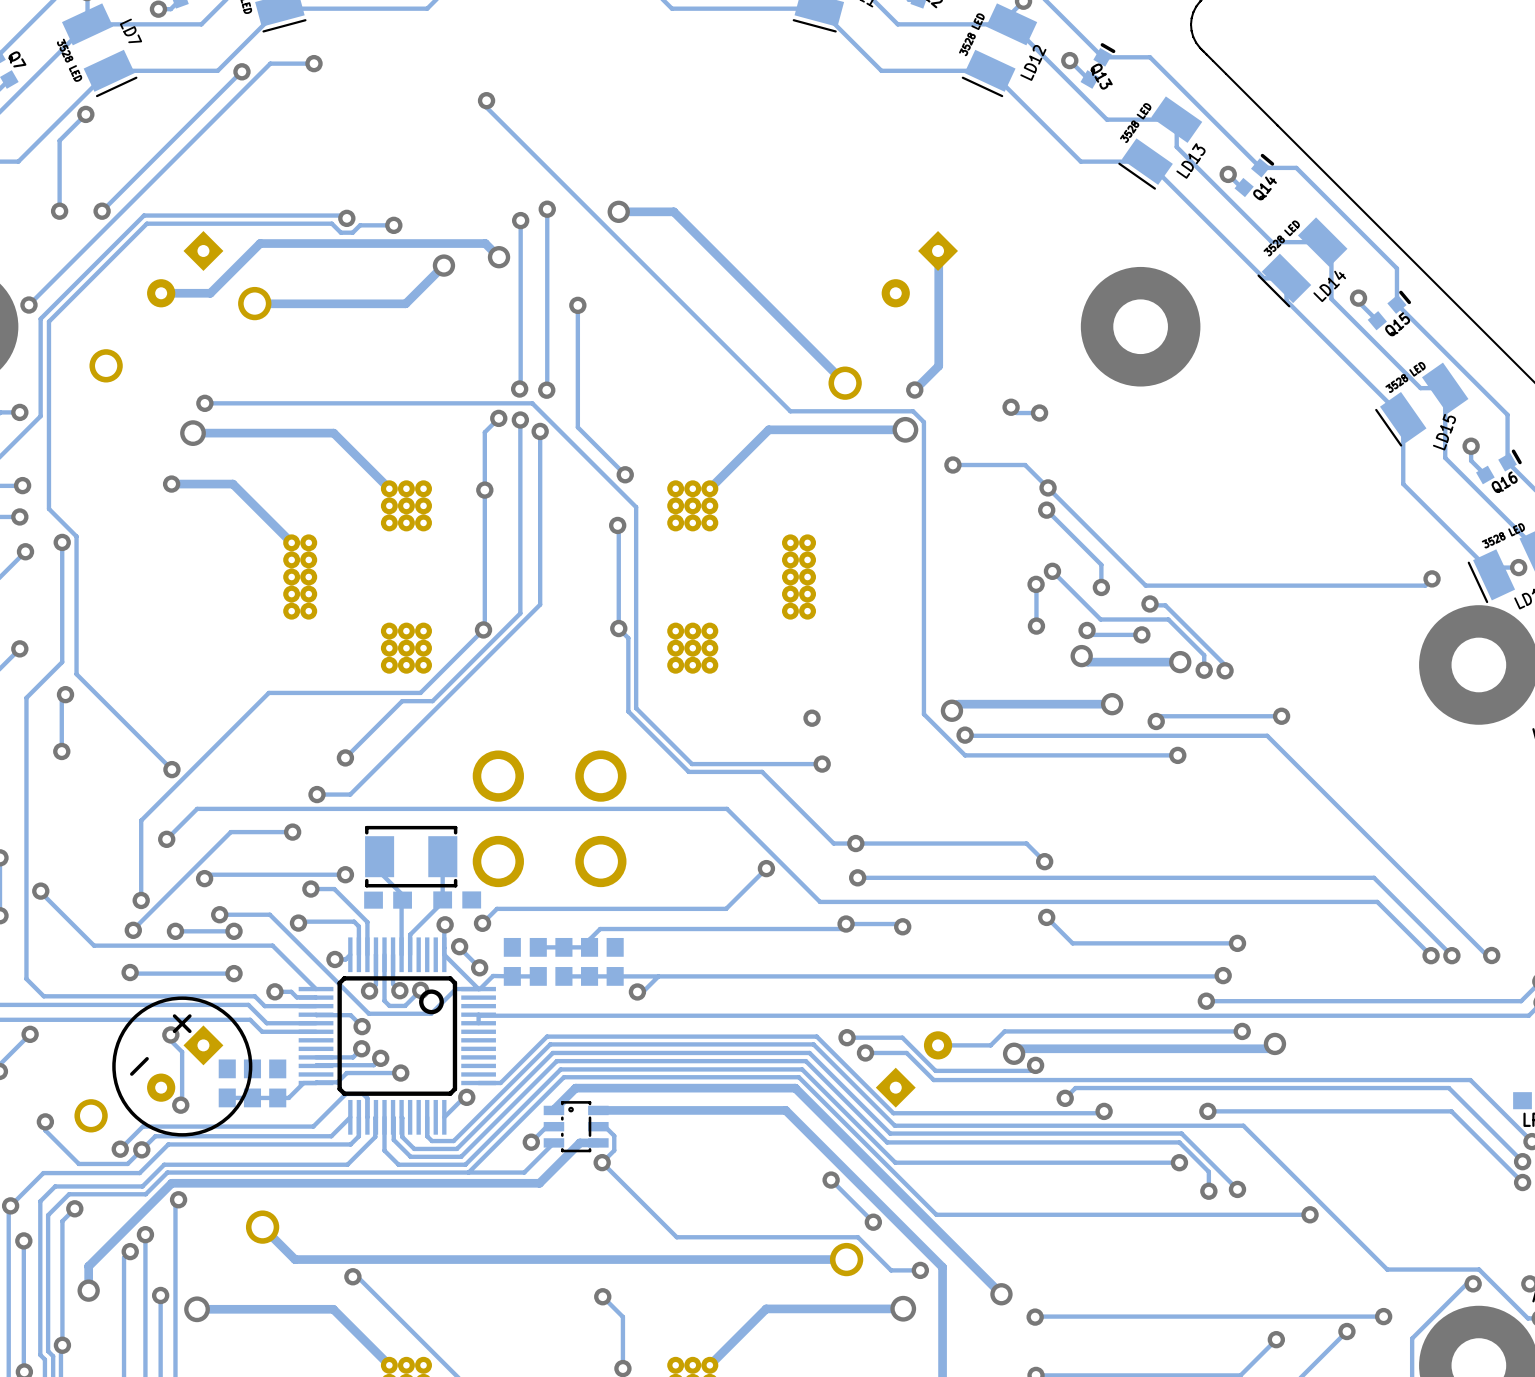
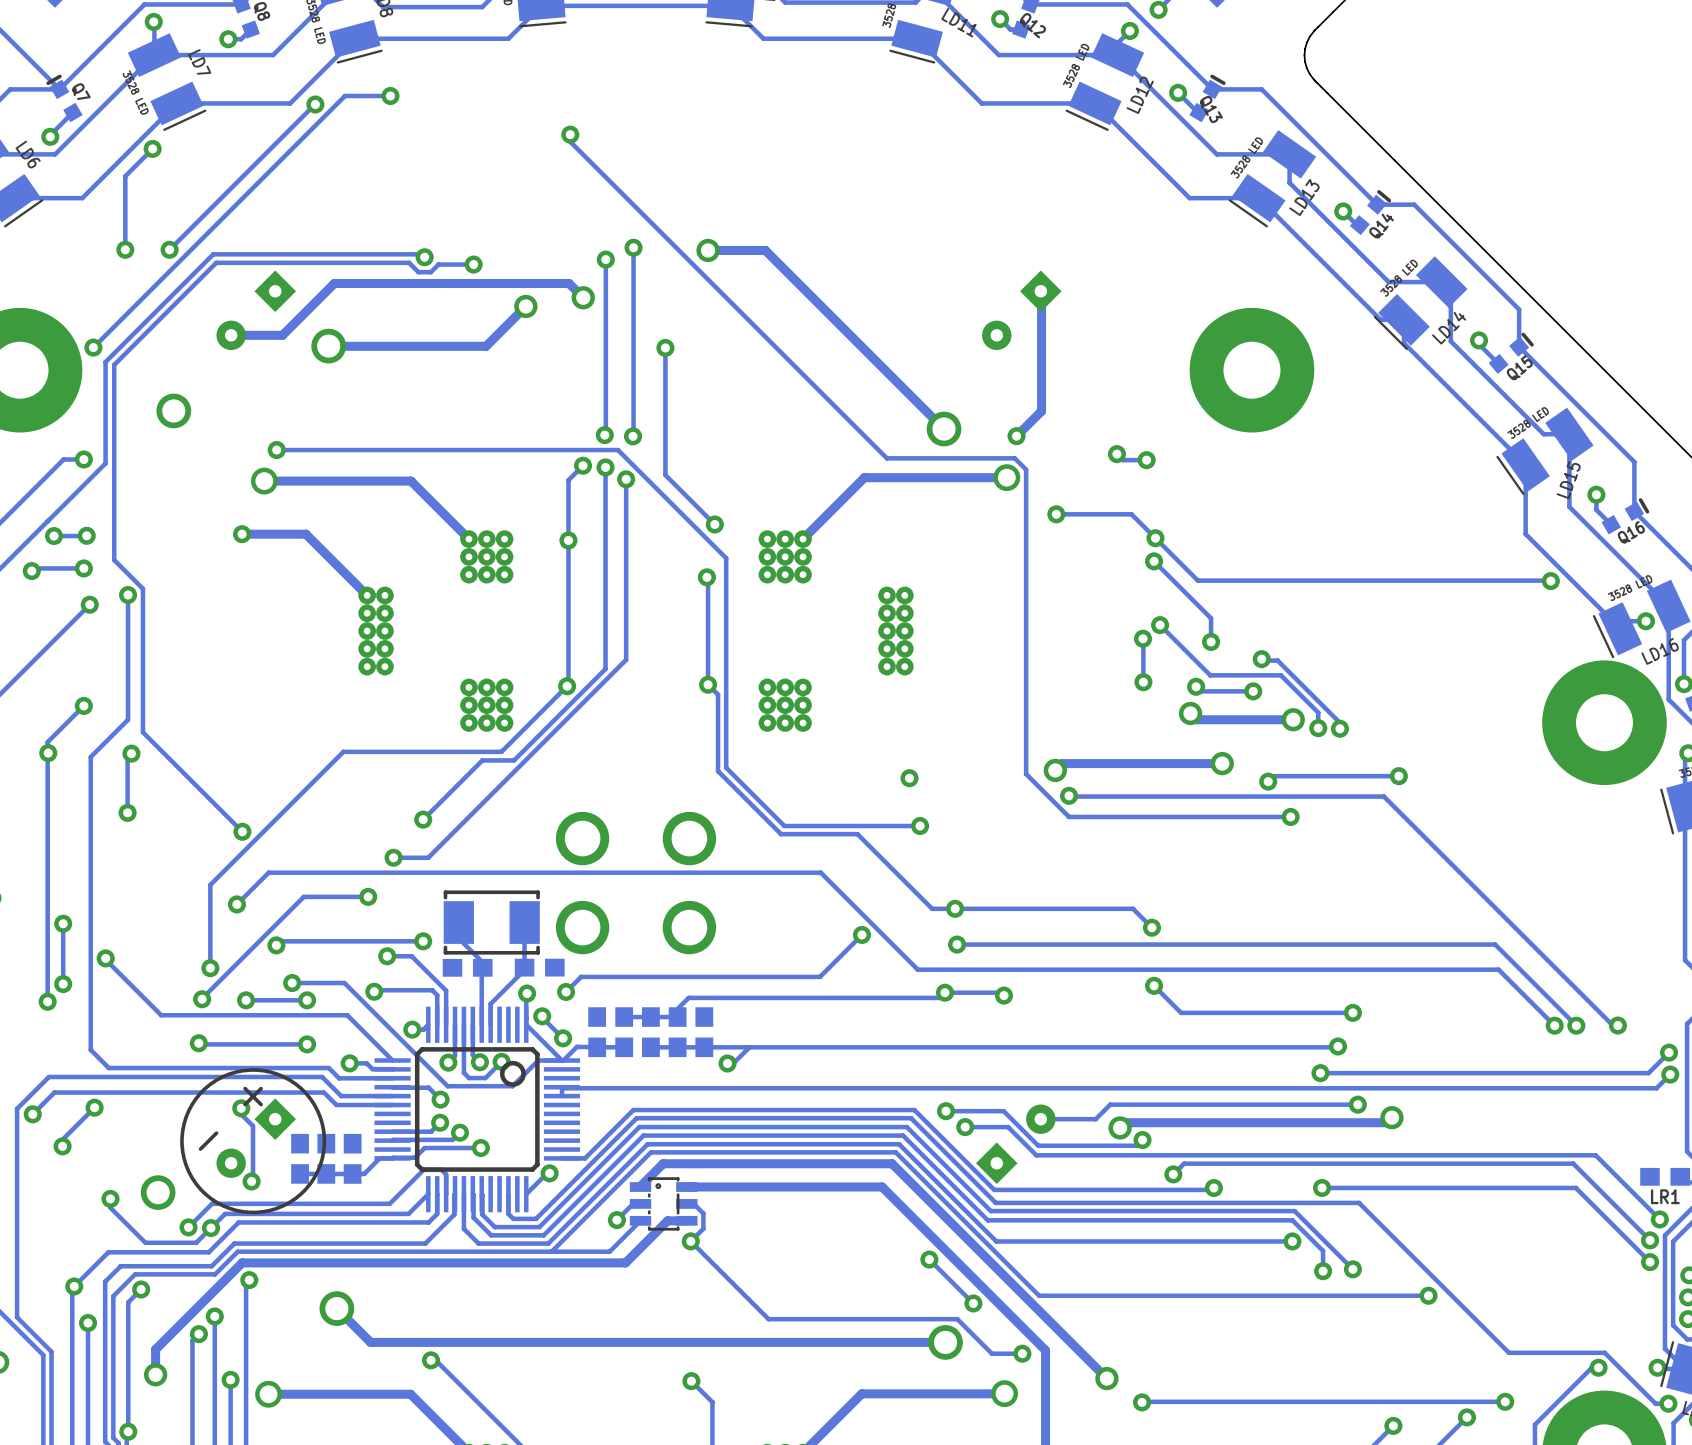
track: (1088, 528) (1145, 585) (1425, 585) (1432, 578) -> (1197, 580) (1550, 581)
via position: (1432, 578) -> (1550, 581)

